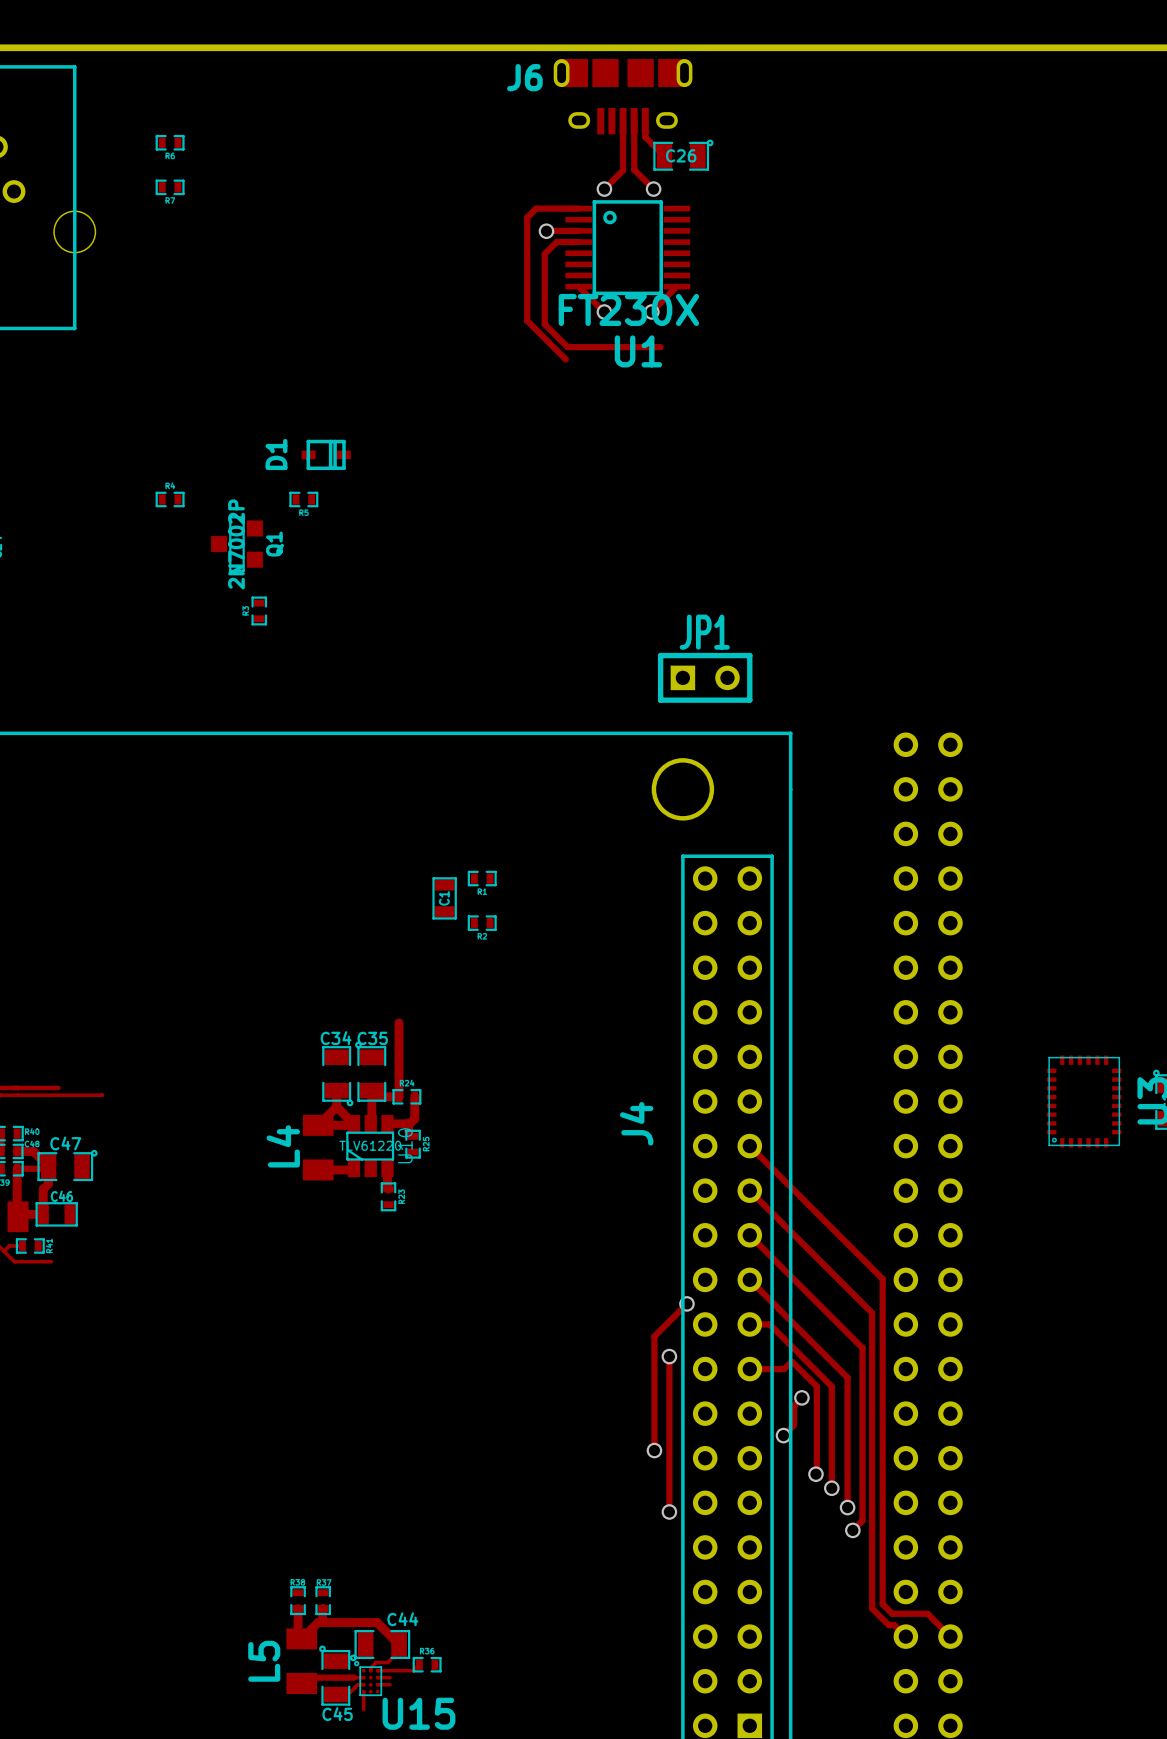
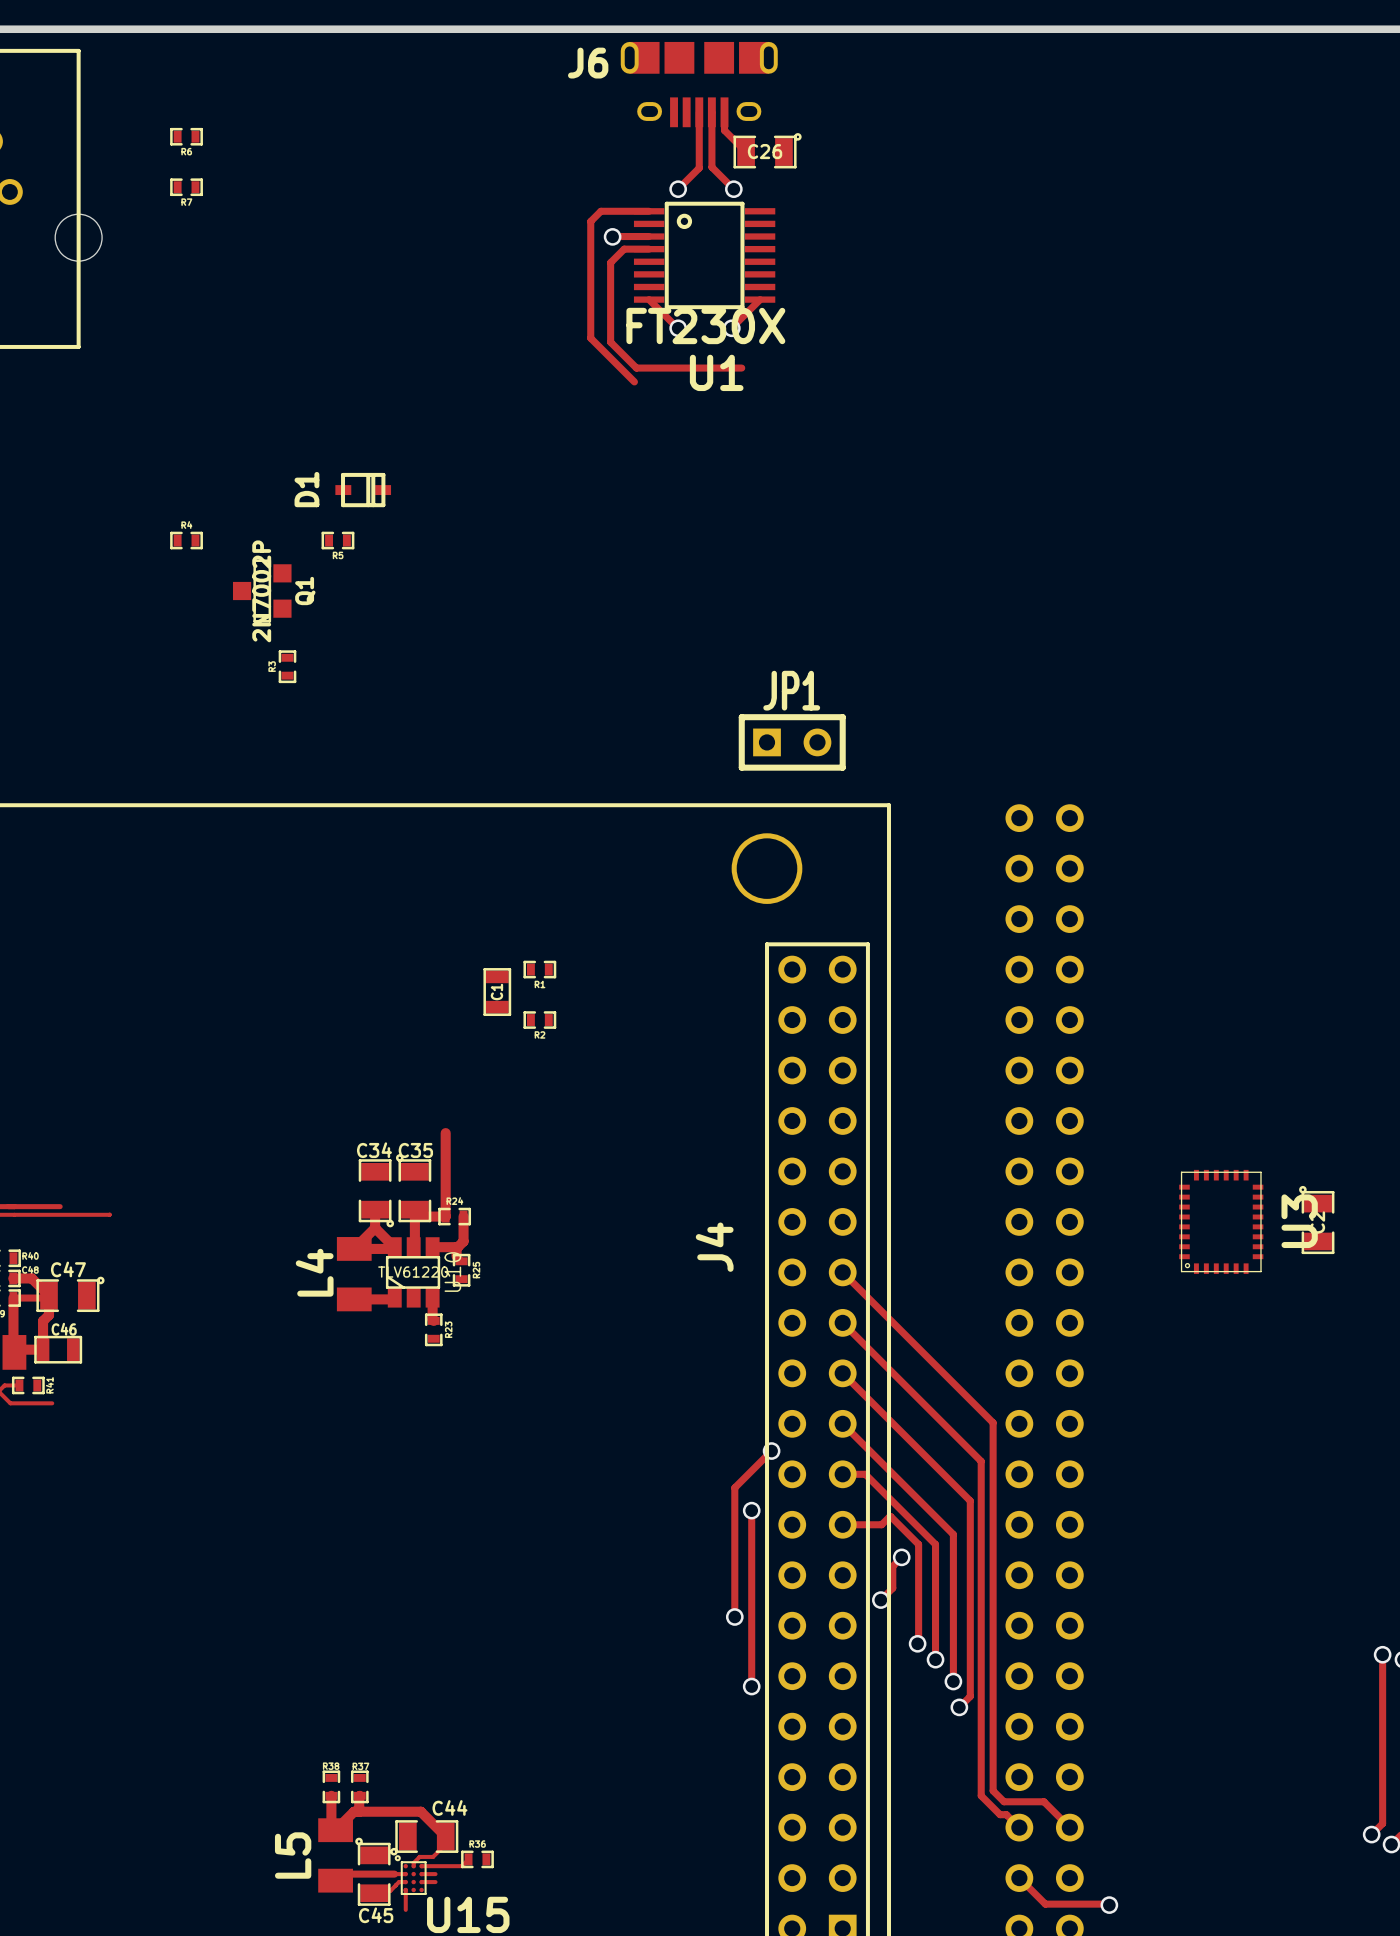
track: none -> (1019, 1878) (1045, 1904) (1109, 1905)
via: none -> (1109, 1905)

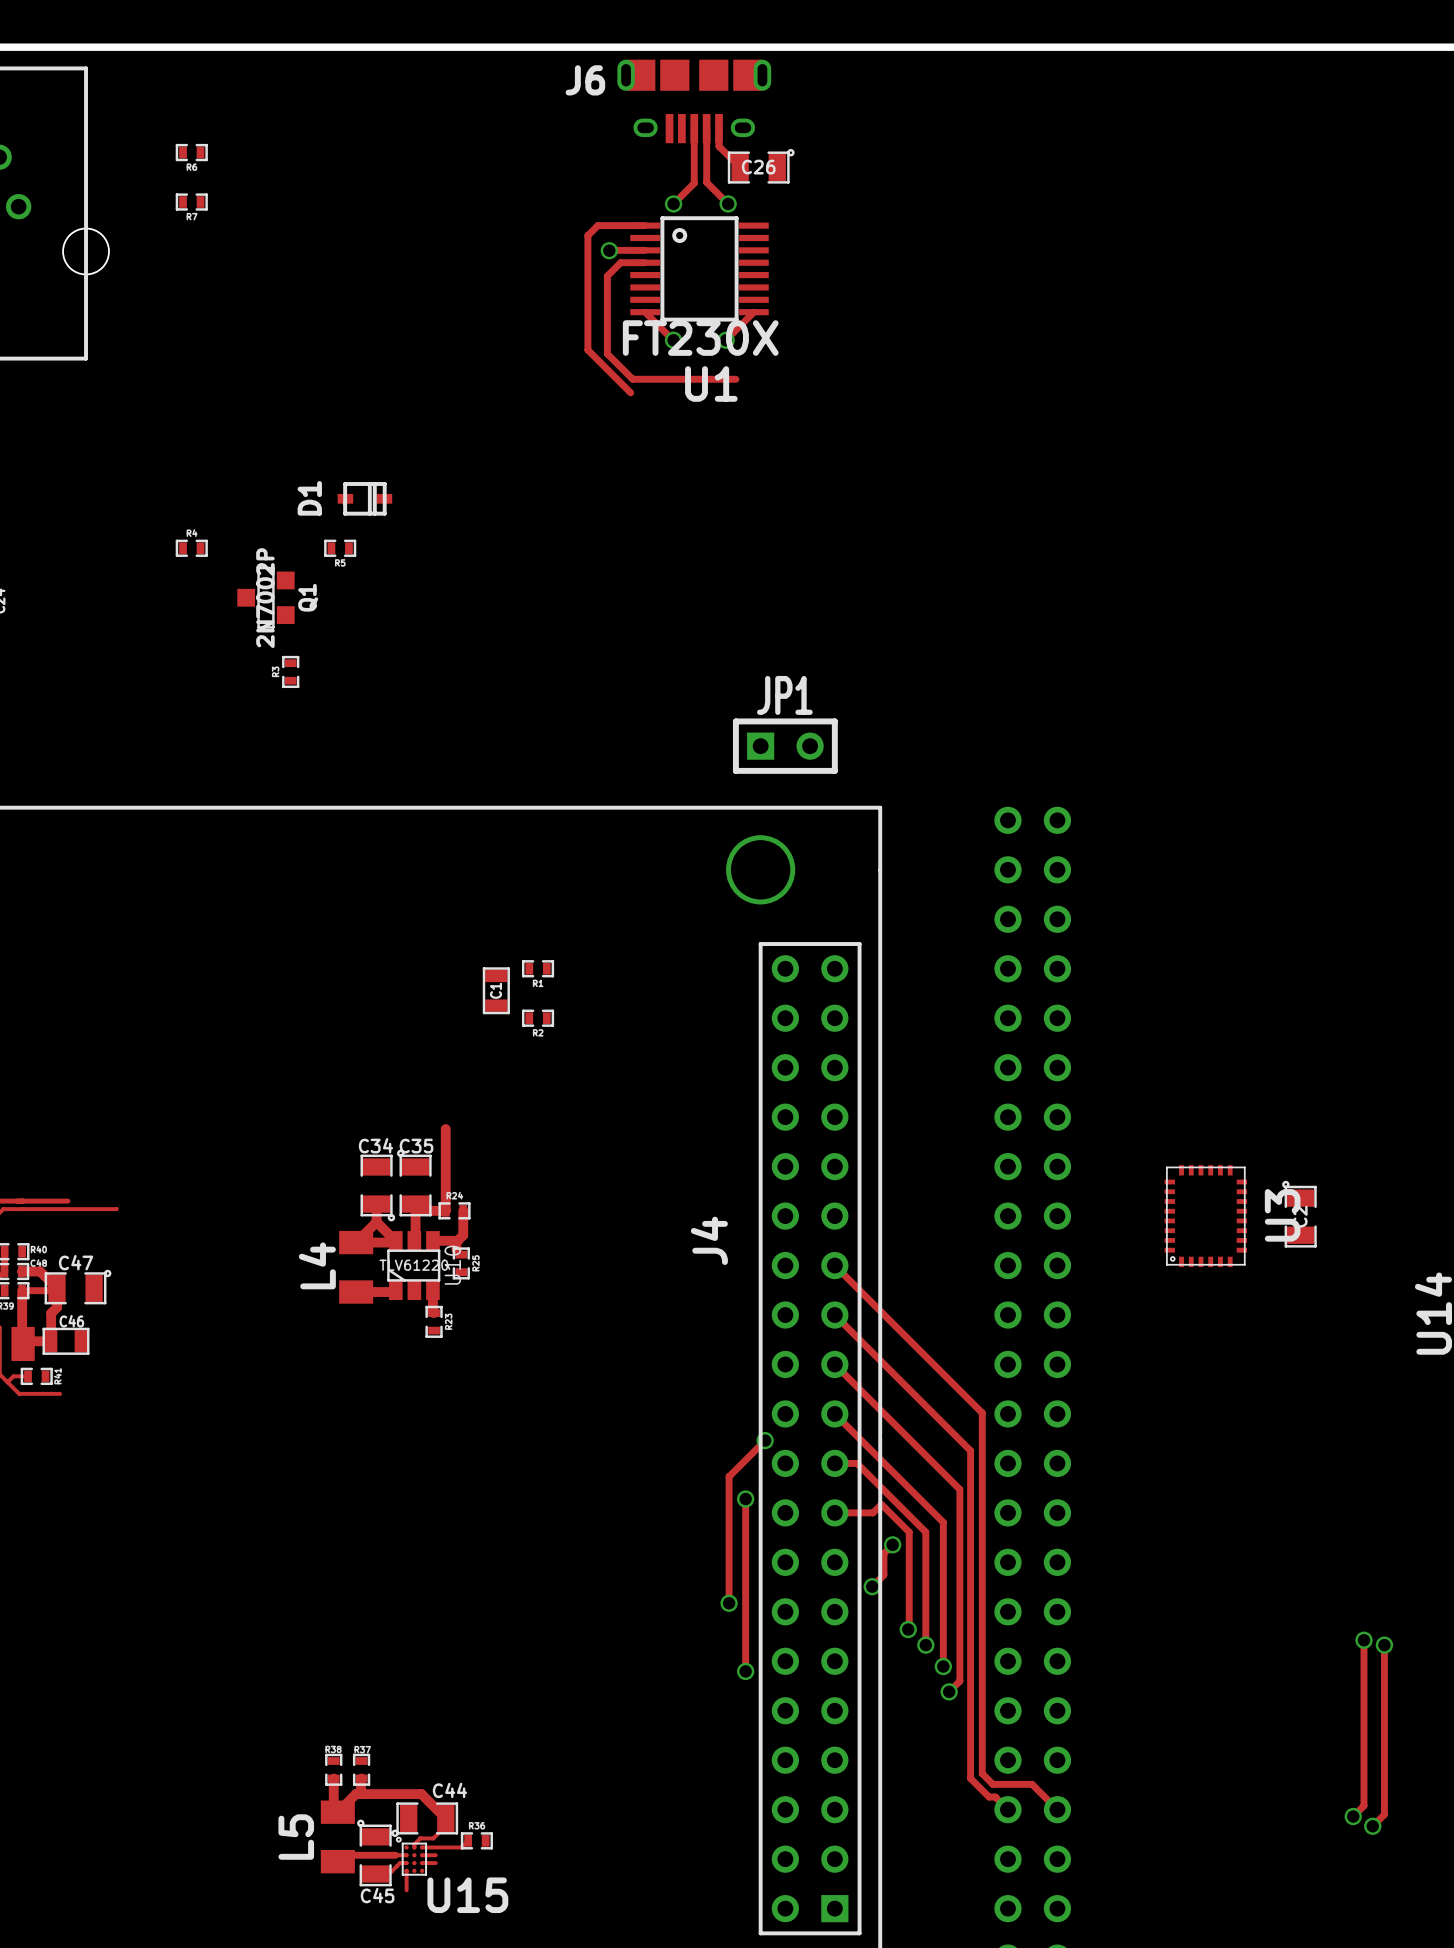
track: (1019, 1878) (1045, 1904) (1109, 1905) -> none
via: (1109, 1905) -> none

